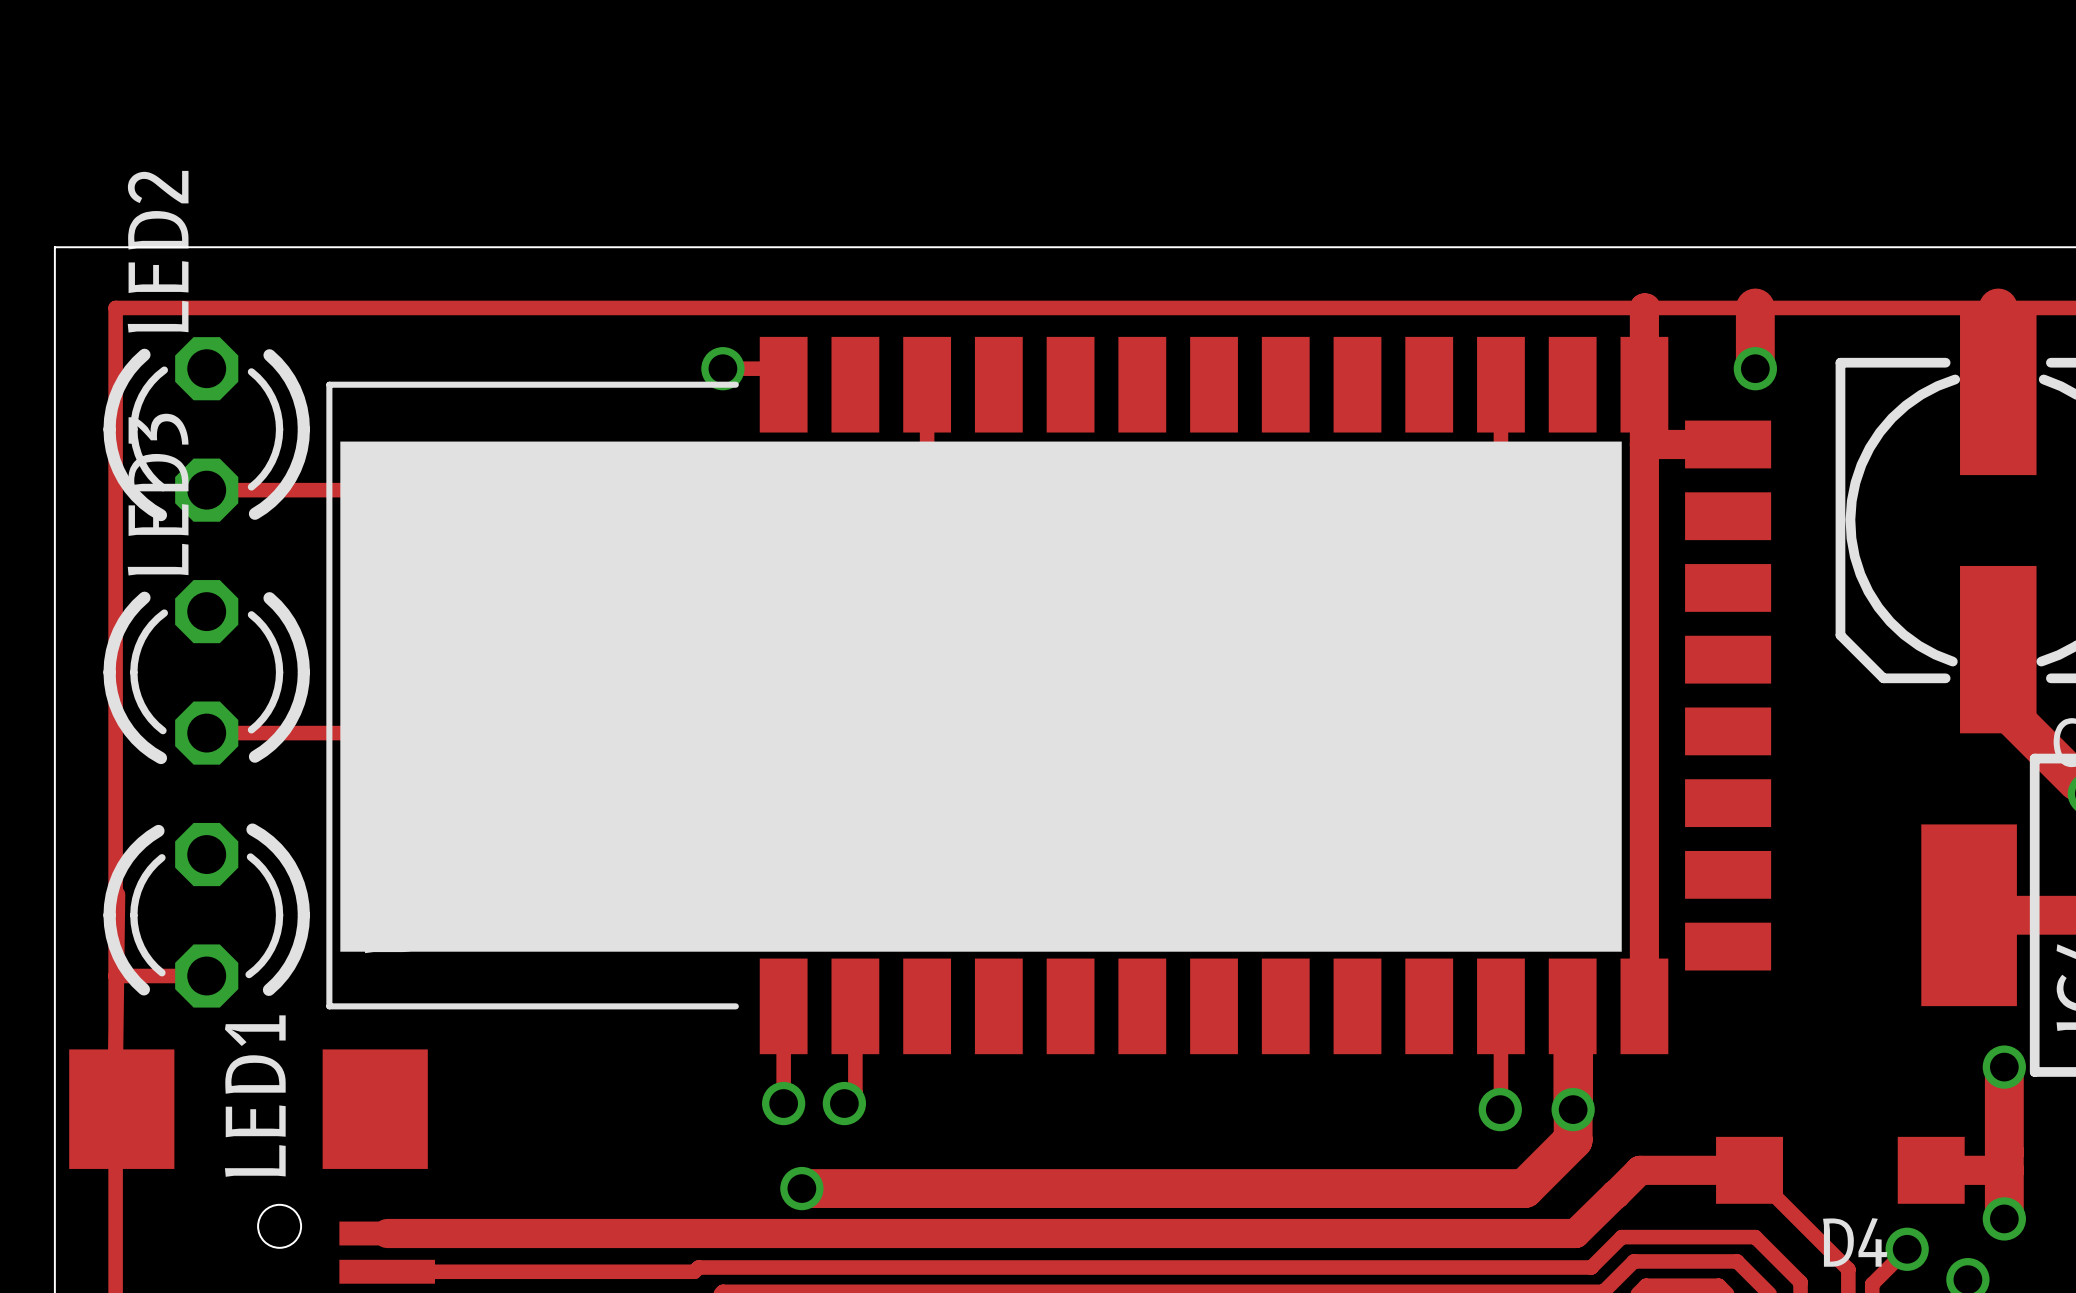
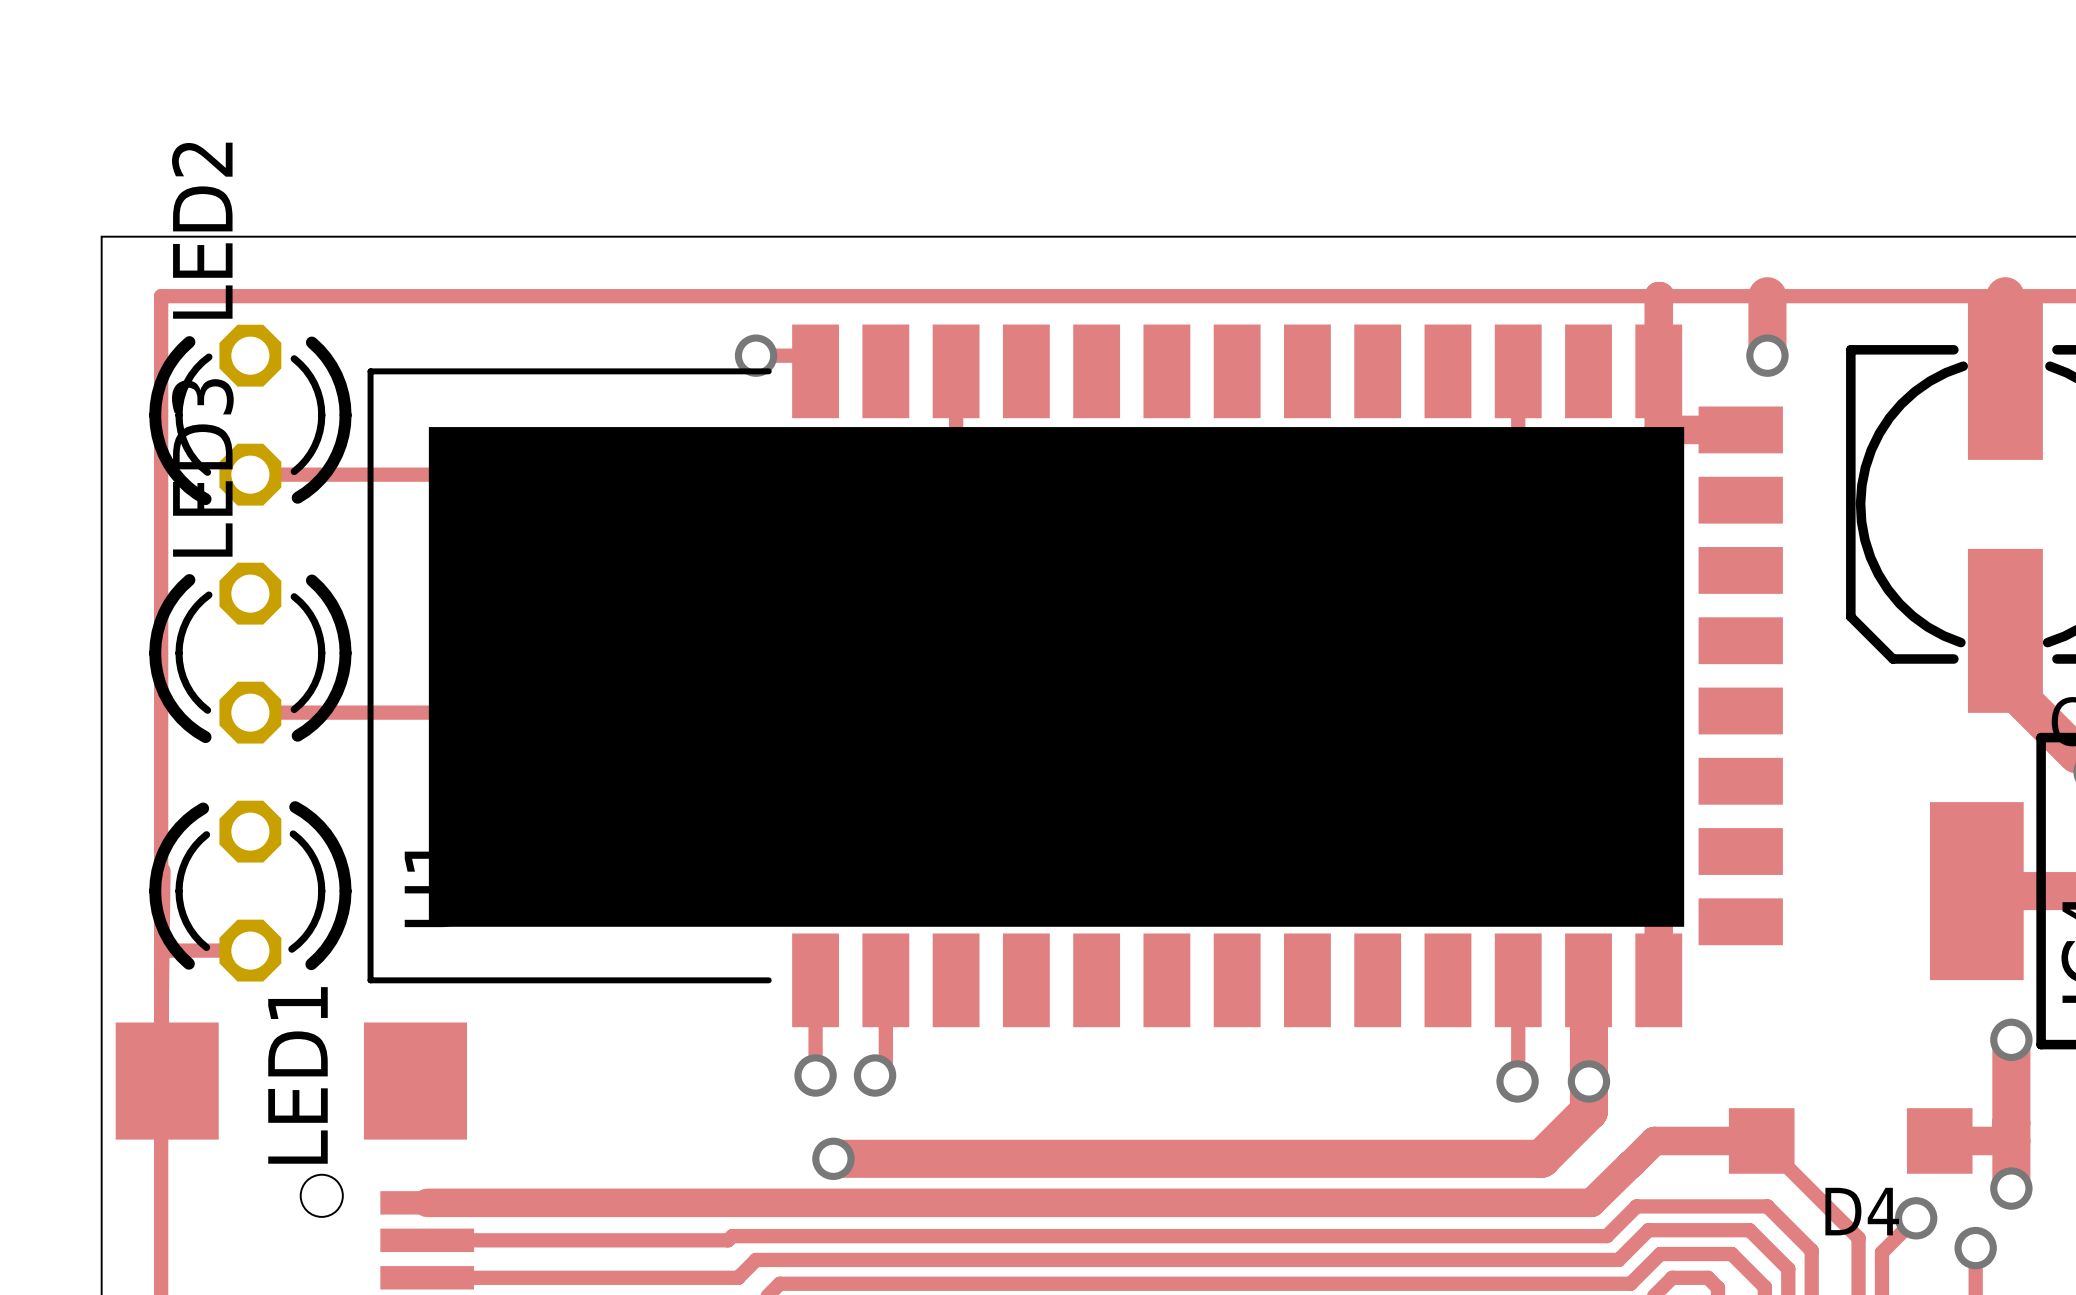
drawing position: (981, 696) -> (1056, 676)

